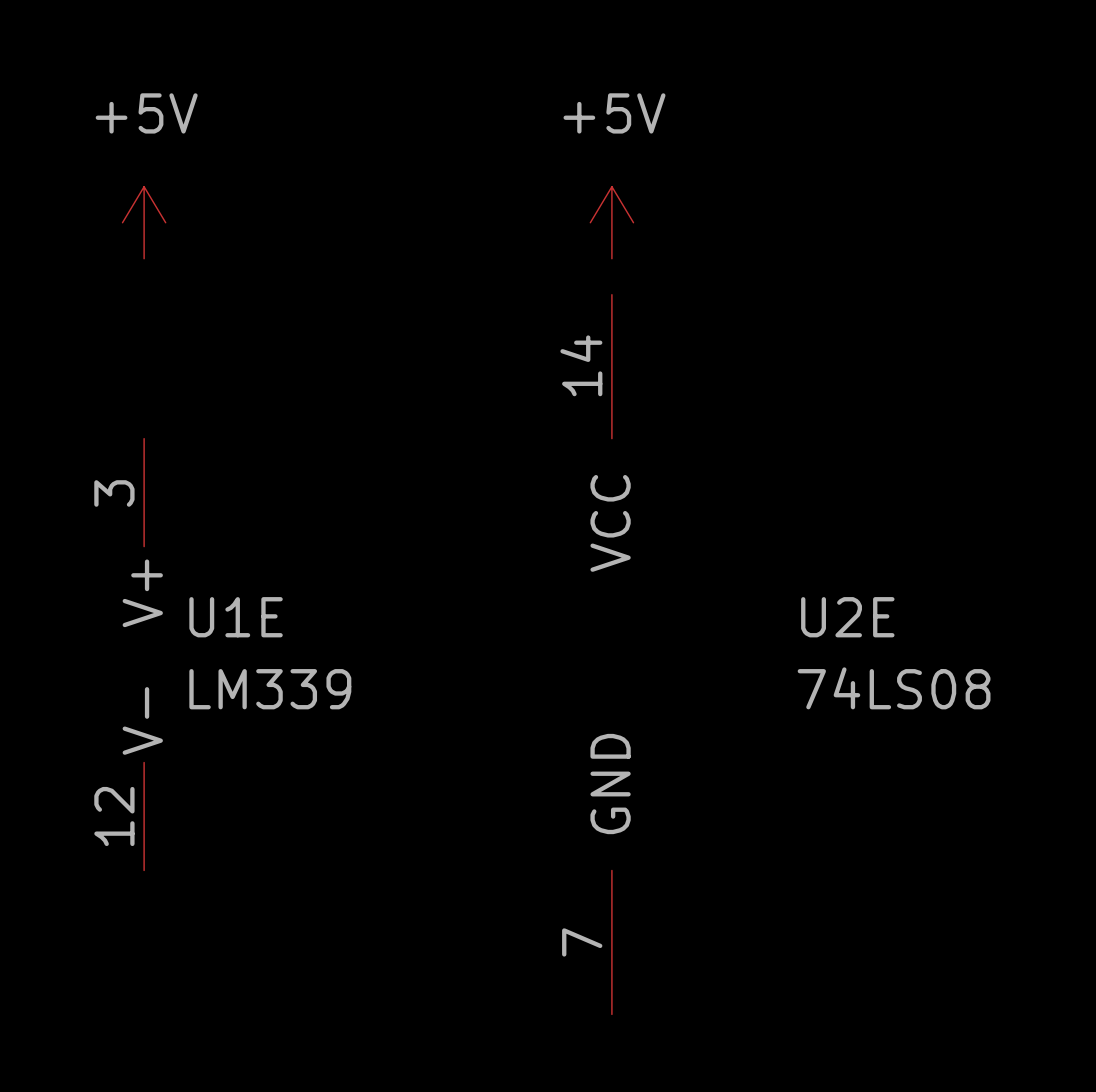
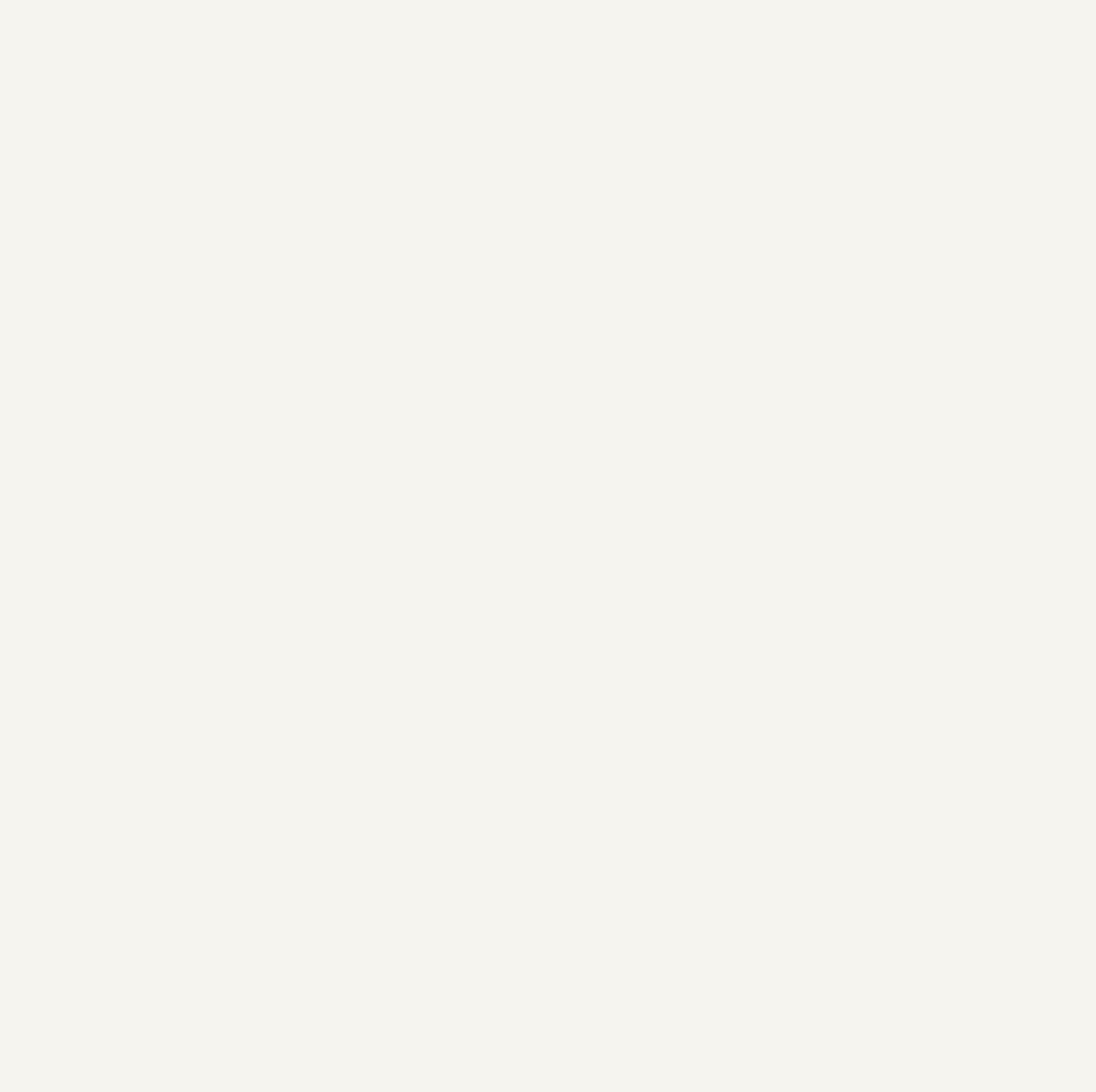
power symbol: +5V (144, 222) -> none
power symbol: +5V (611, 222) -> none
U1E: LM339 (144, 654) -> none
U2E: 74LS08 (611, 654) -> none

